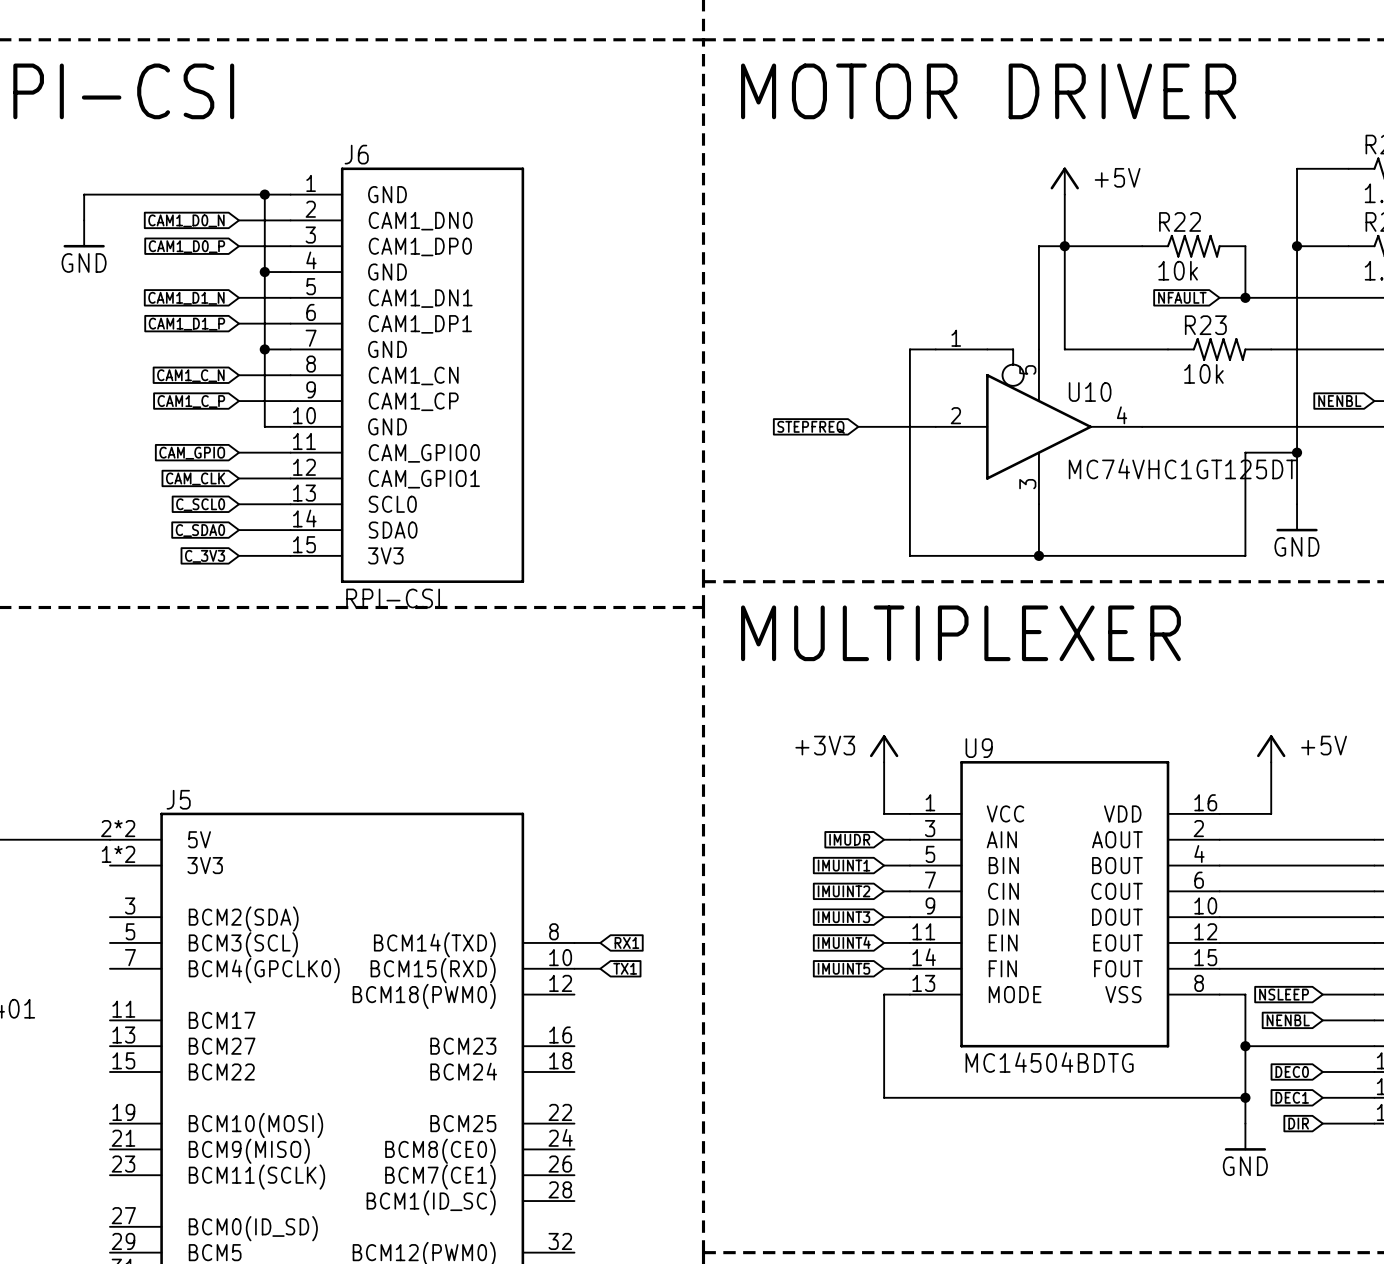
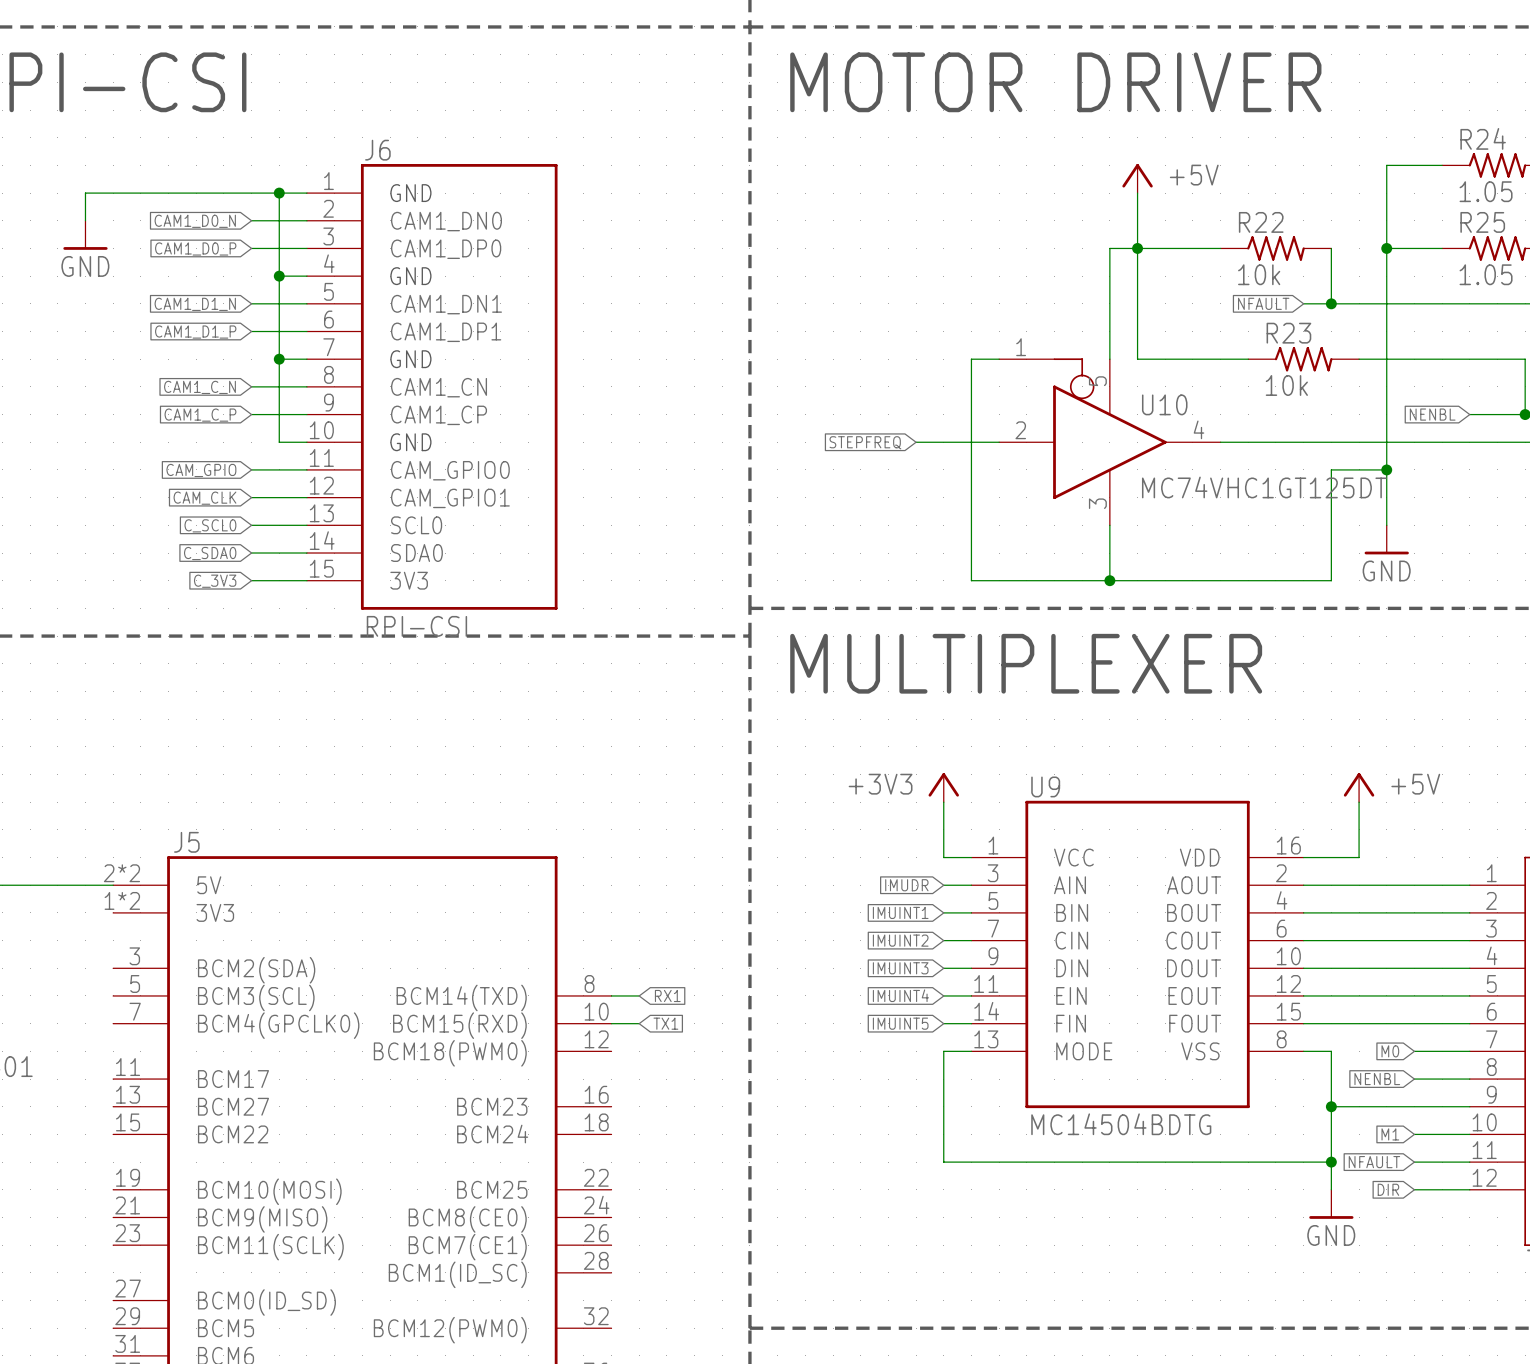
global label: NSLEEP (1284, 994) -> M0 (1390, 1051)
global label: DEC0 (1292, 1071) -> M1 (1390, 1134)
global label: DEC1 (1292, 1097) -> NFAULT (1374, 1162)

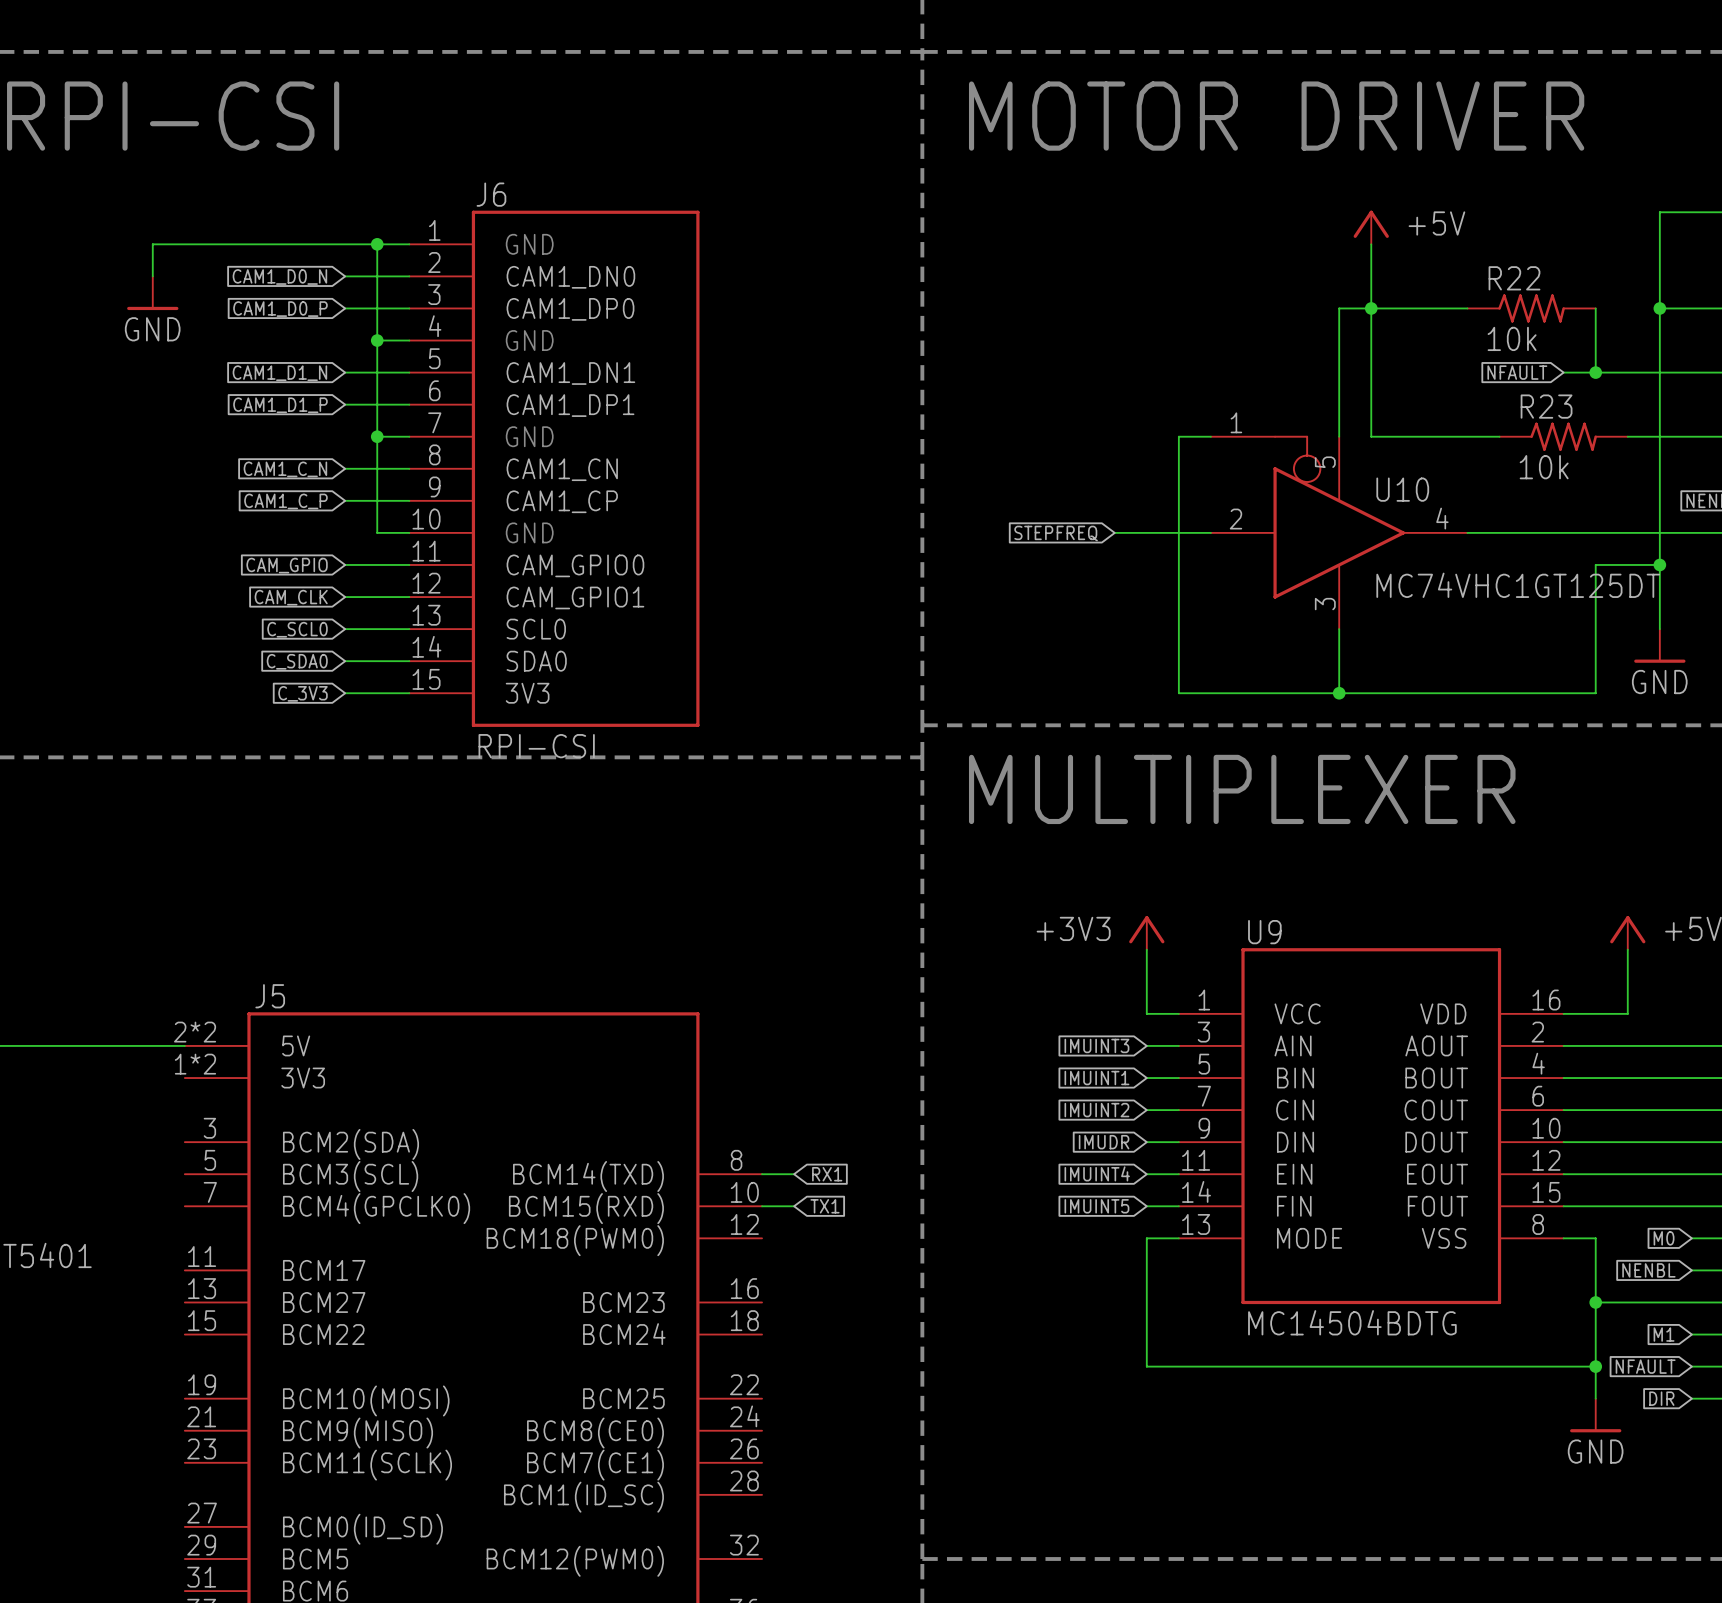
global label: IMUDR (906, 885) -> IMUINT3 (1096, 1045)
global label: IMUINT3 (900, 968) -> IMUDR (1104, 1142)

